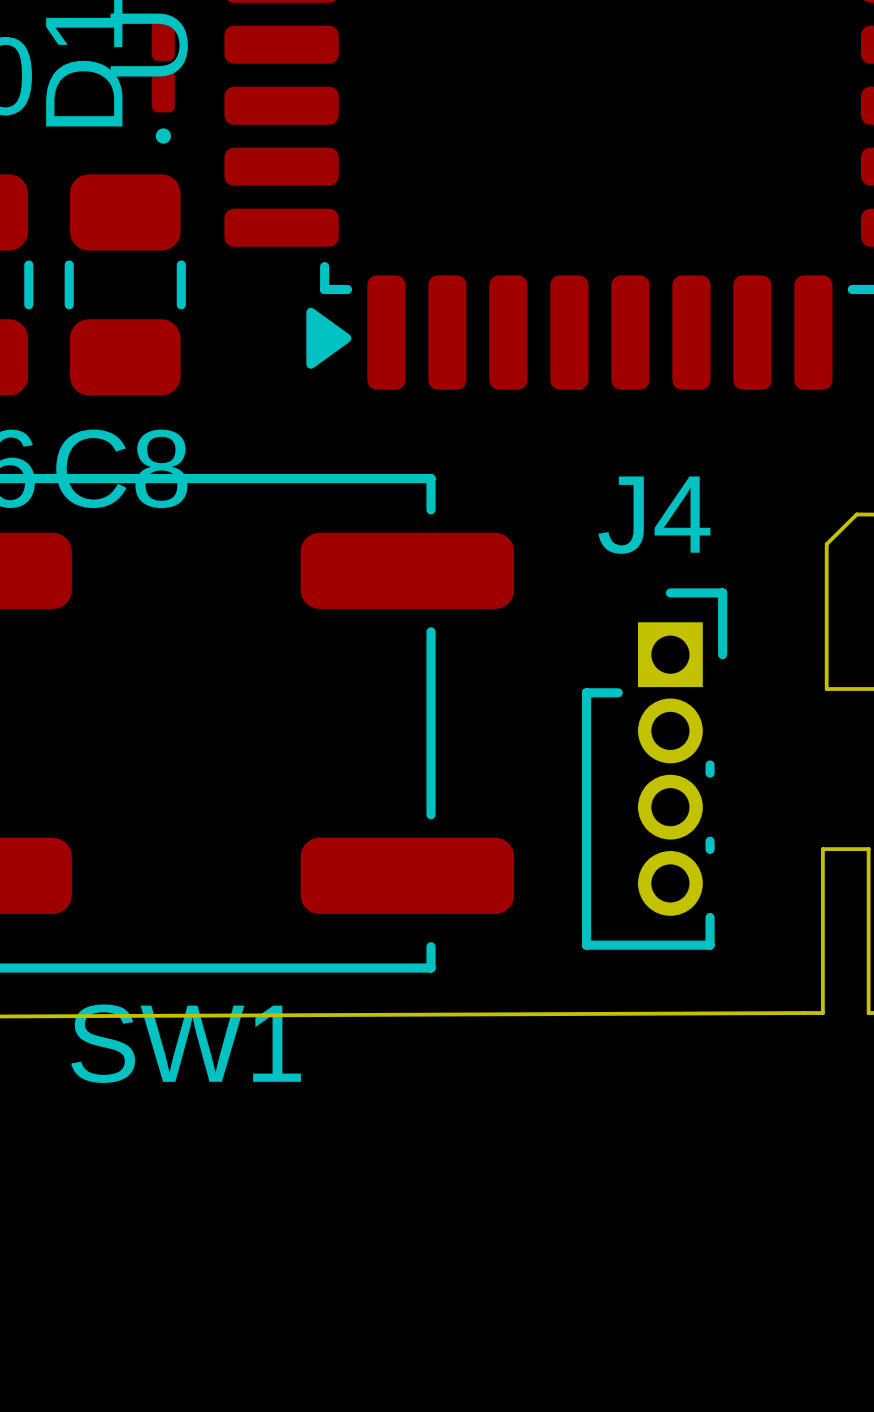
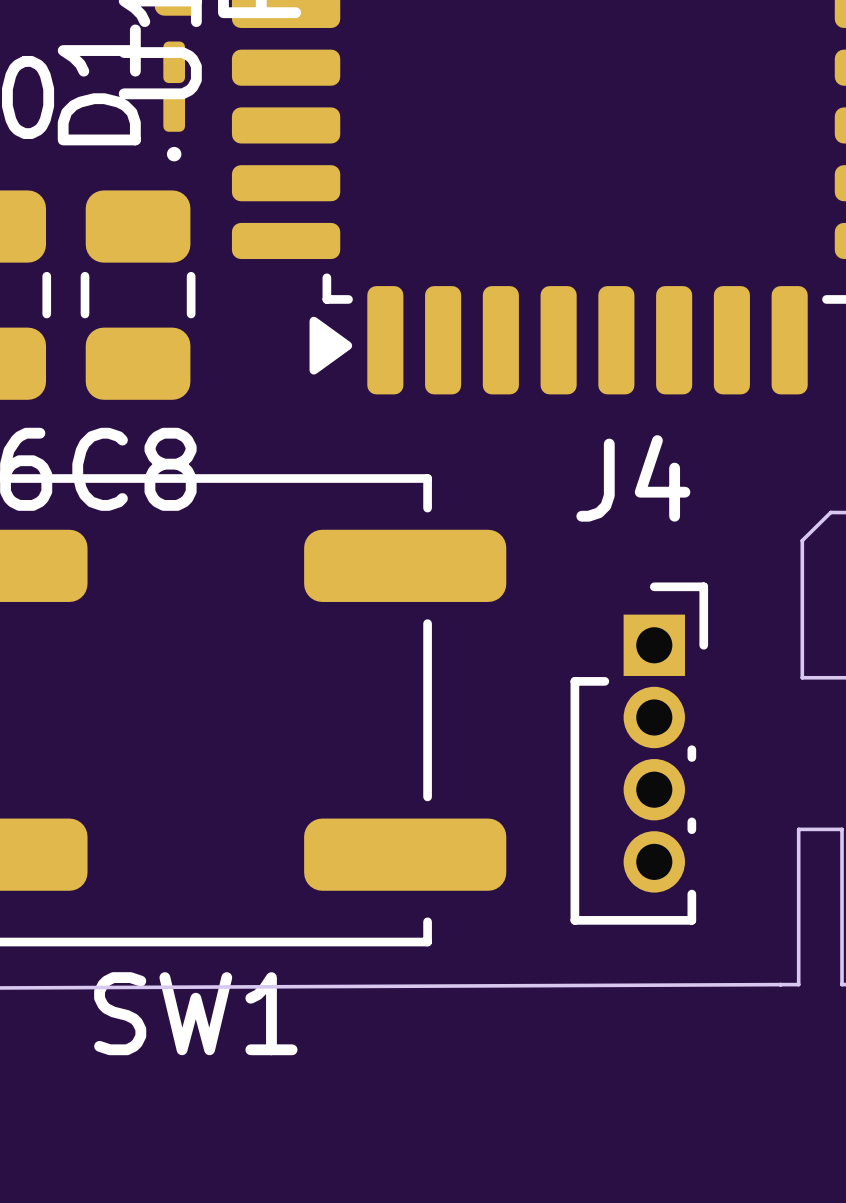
J4 name position: J4 (654, 515) -> J4 (633, 478)

